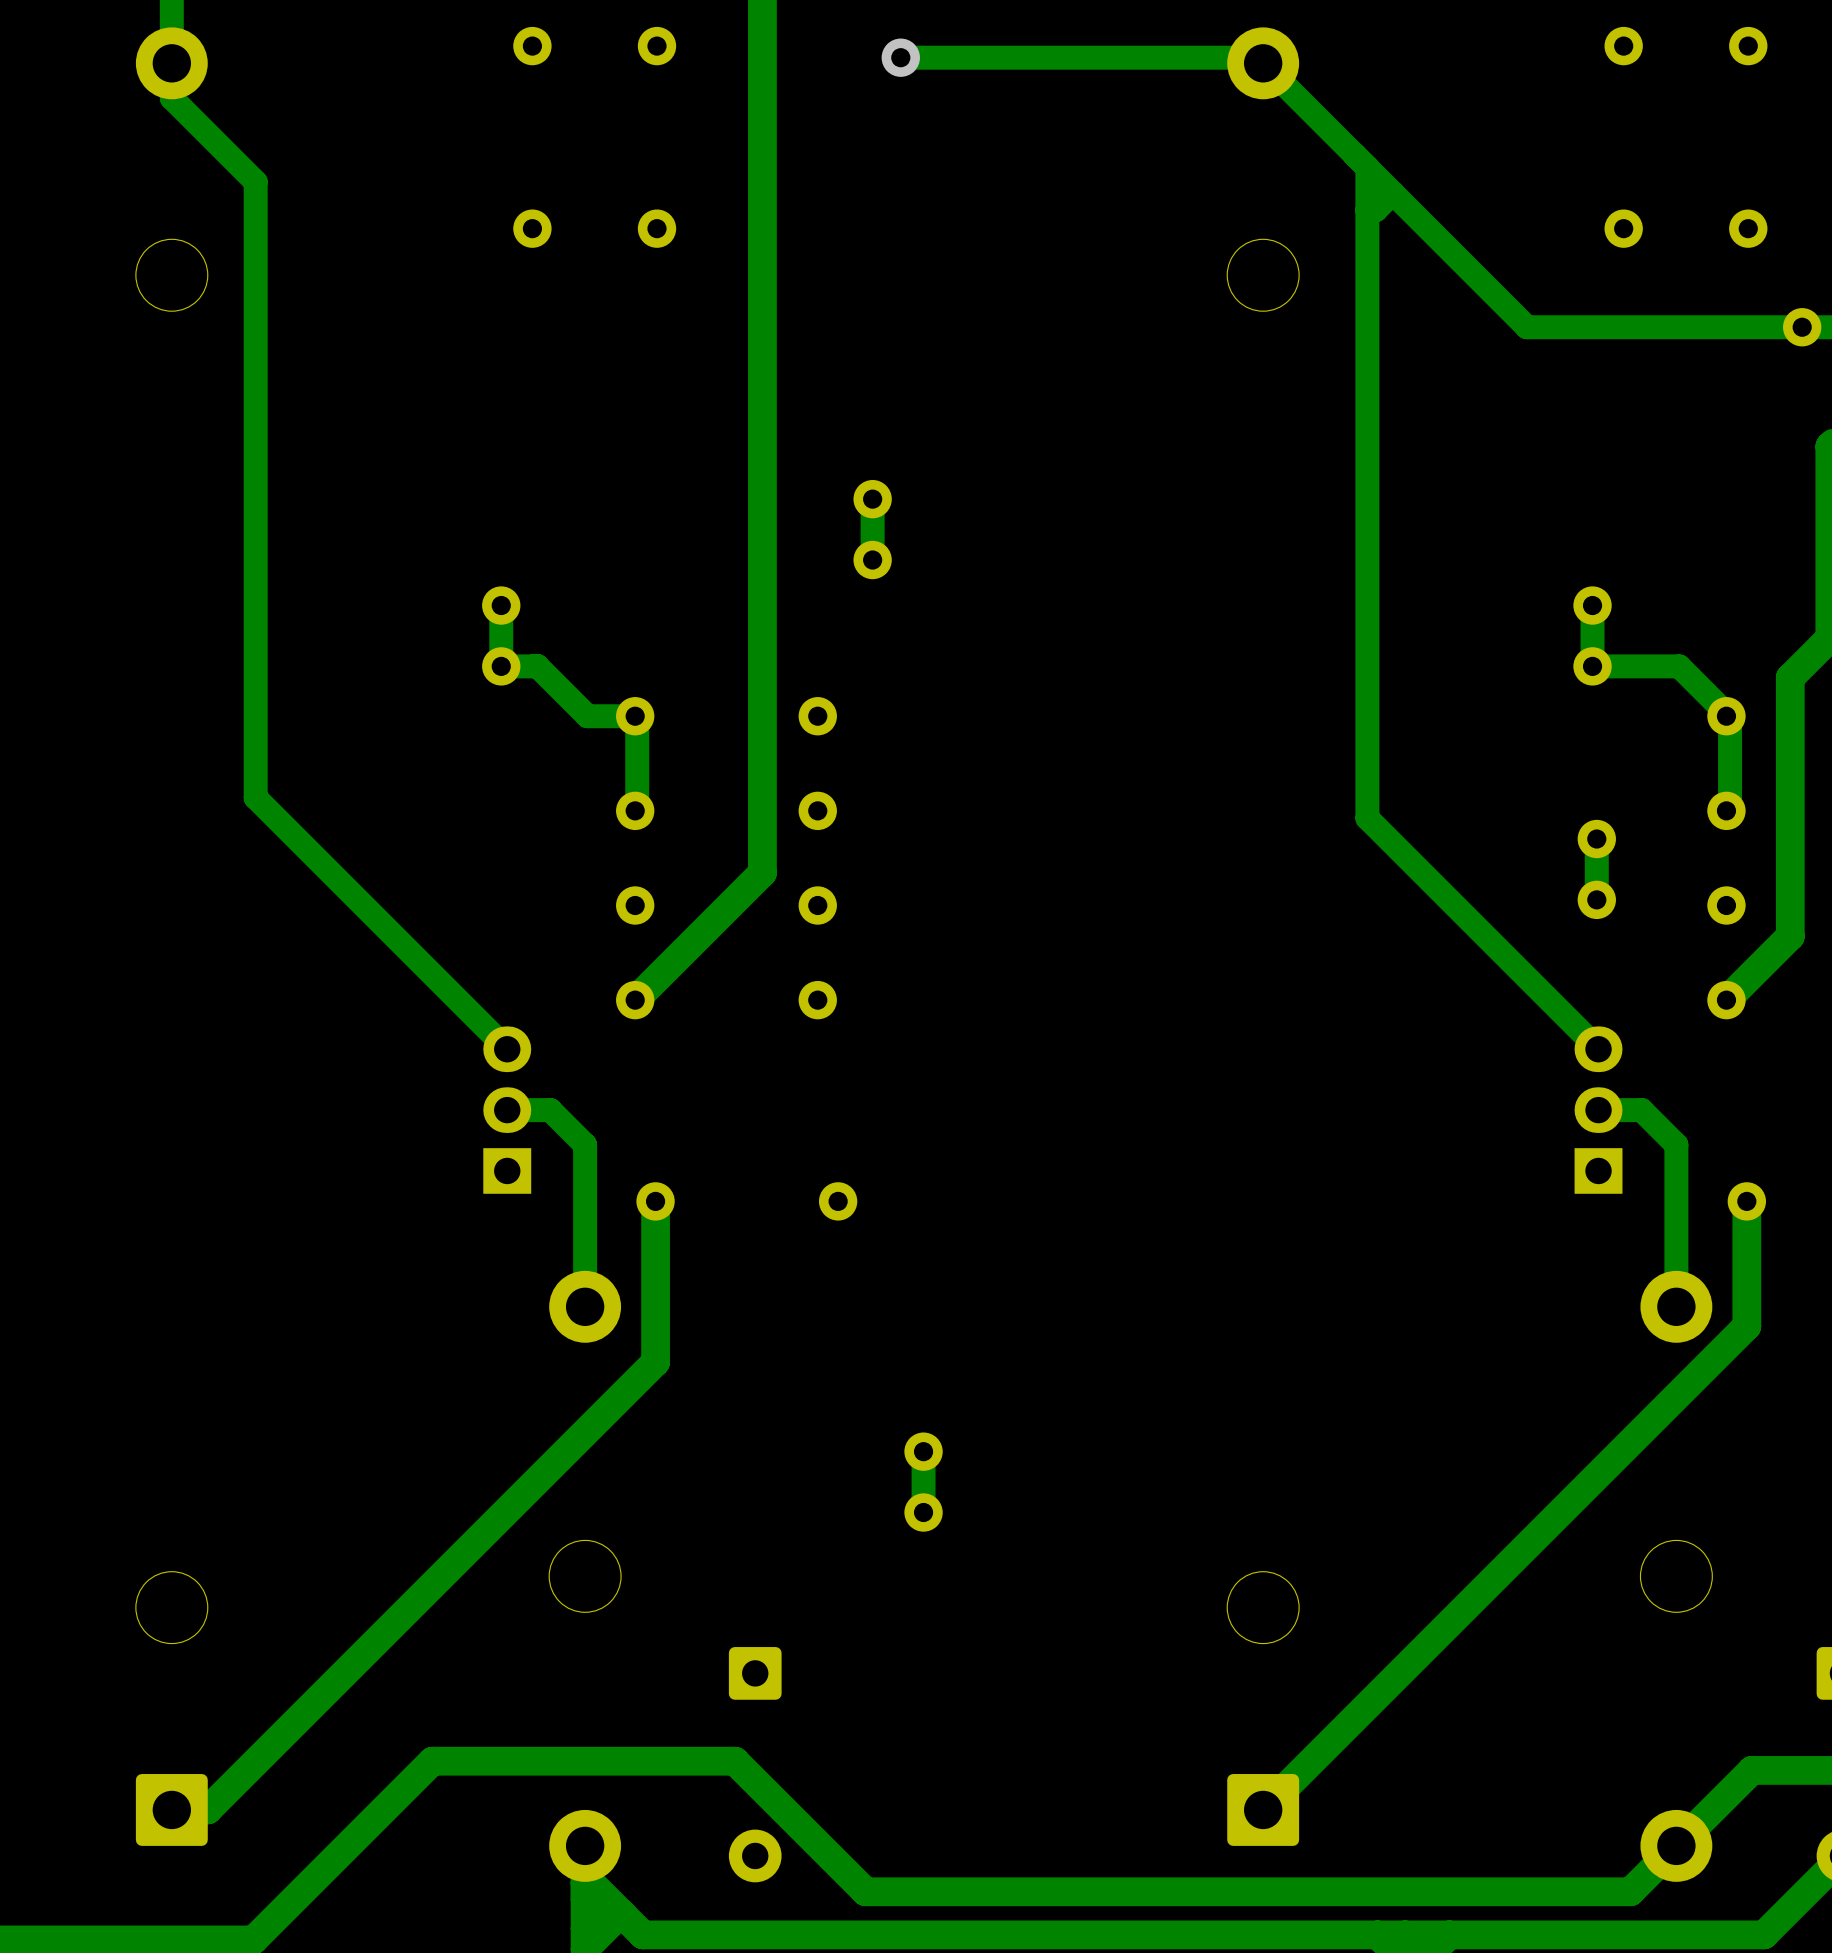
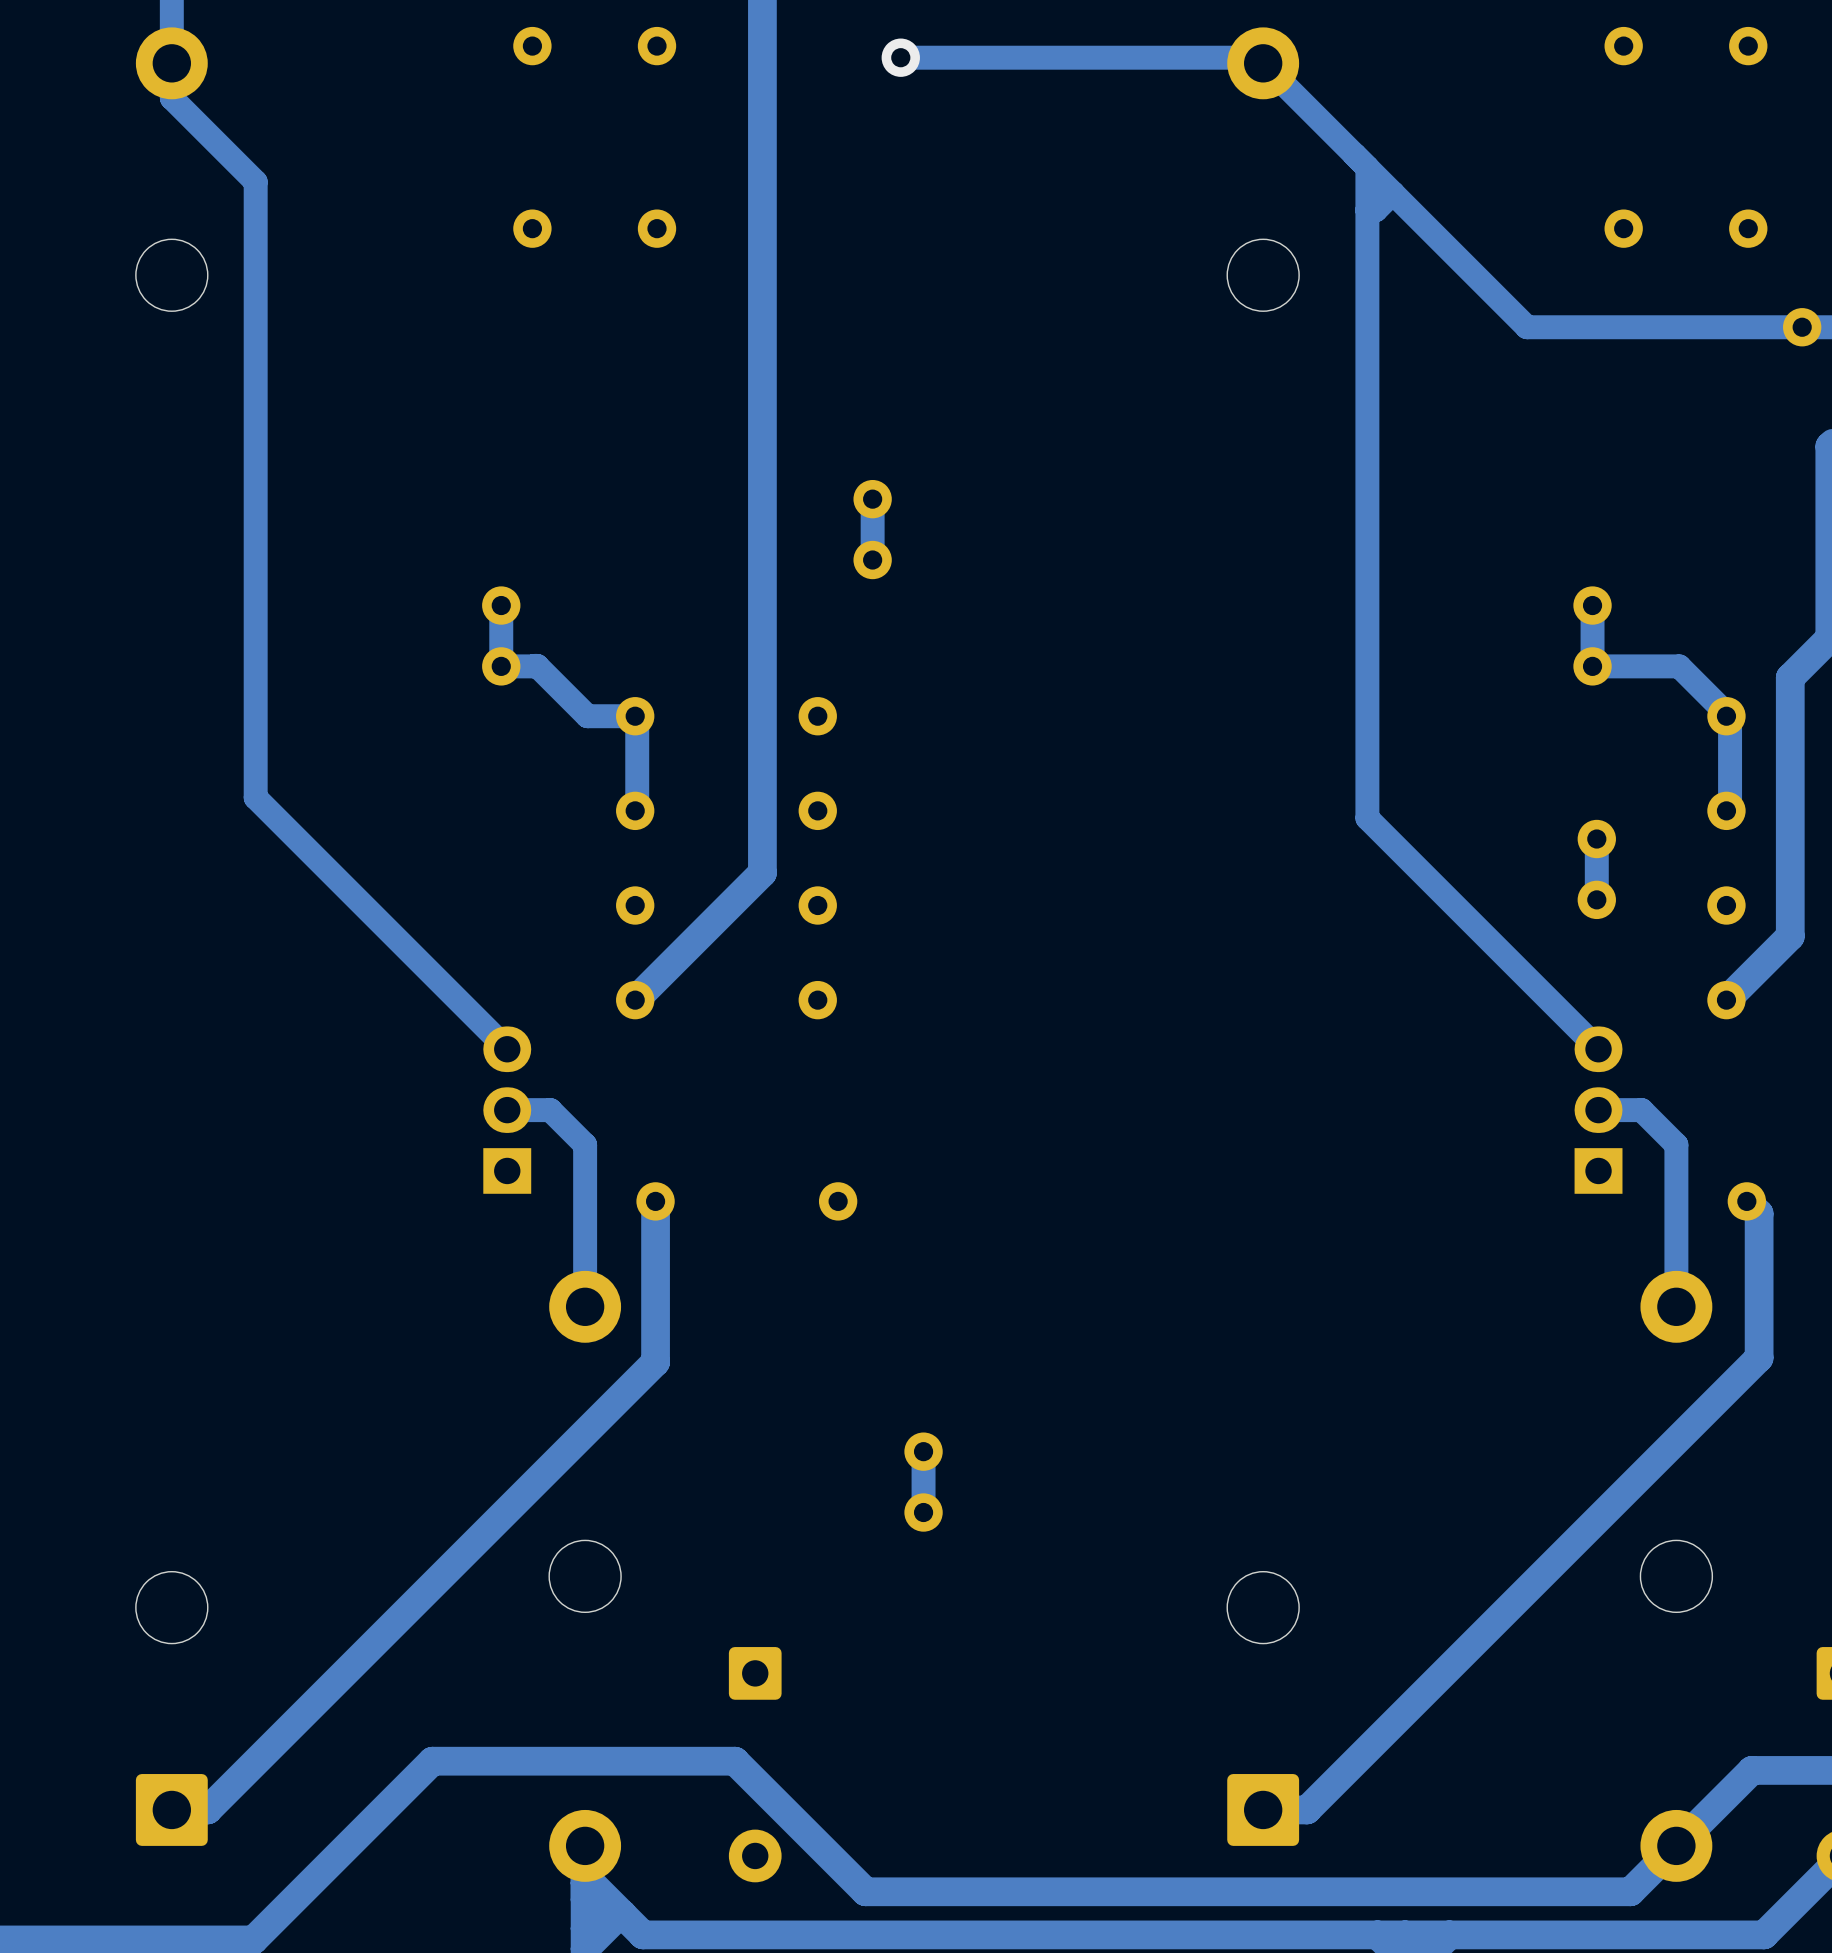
track: (1746, 1201) (1746, 1326) (1263, 1809) -> (1746, 1201) (1759, 1213) (1759, 1357) (1307, 1809) (1263, 1809)

